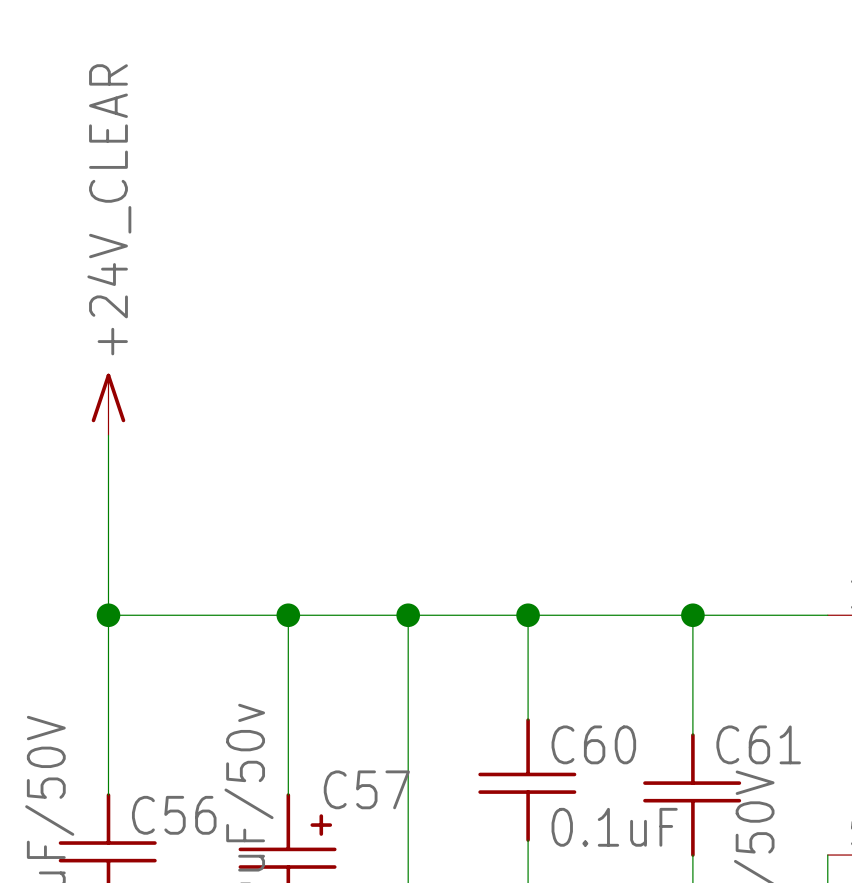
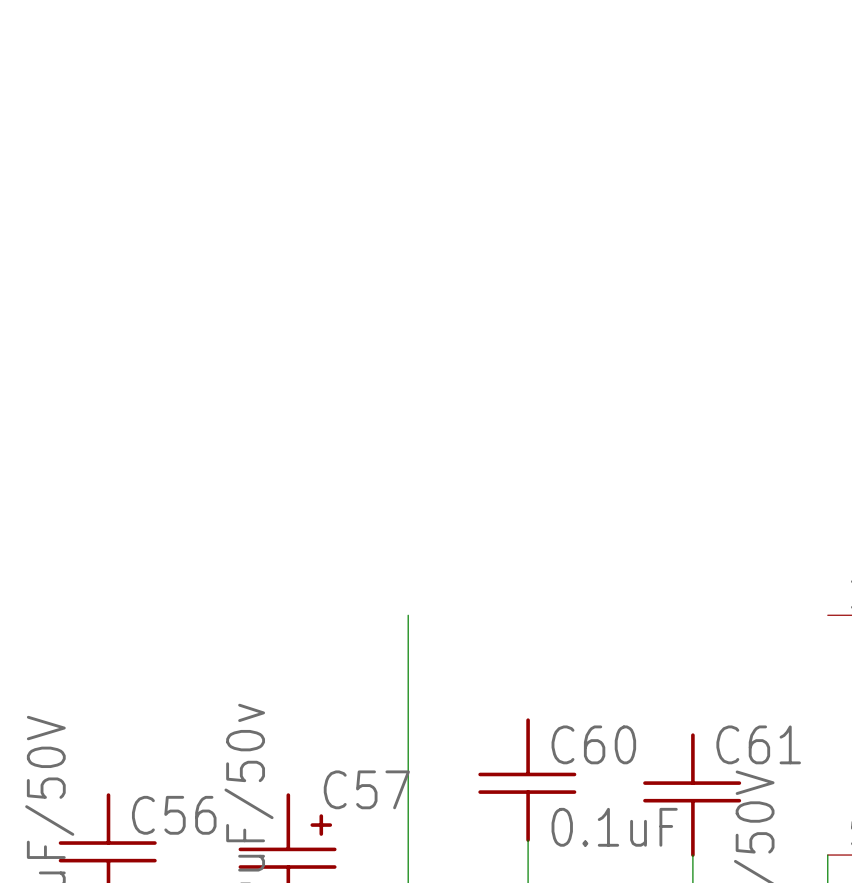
power symbol: +24V_CLEAR (108, 404) -> none
wire: (108, 435) (108, 795) -> none
wire: (108, 615) (827, 615) -> none
junction: (108, 615) -> none
wire: (288, 615) (288, 795) -> none
junction: (288, 615) -> none
junction: (408, 615) -> none
wire: (528, 615) (528, 720) -> none
junction: (528, 615) -> none
wire: (692, 615) (692, 735) -> none
junction: (692, 615) -> none

